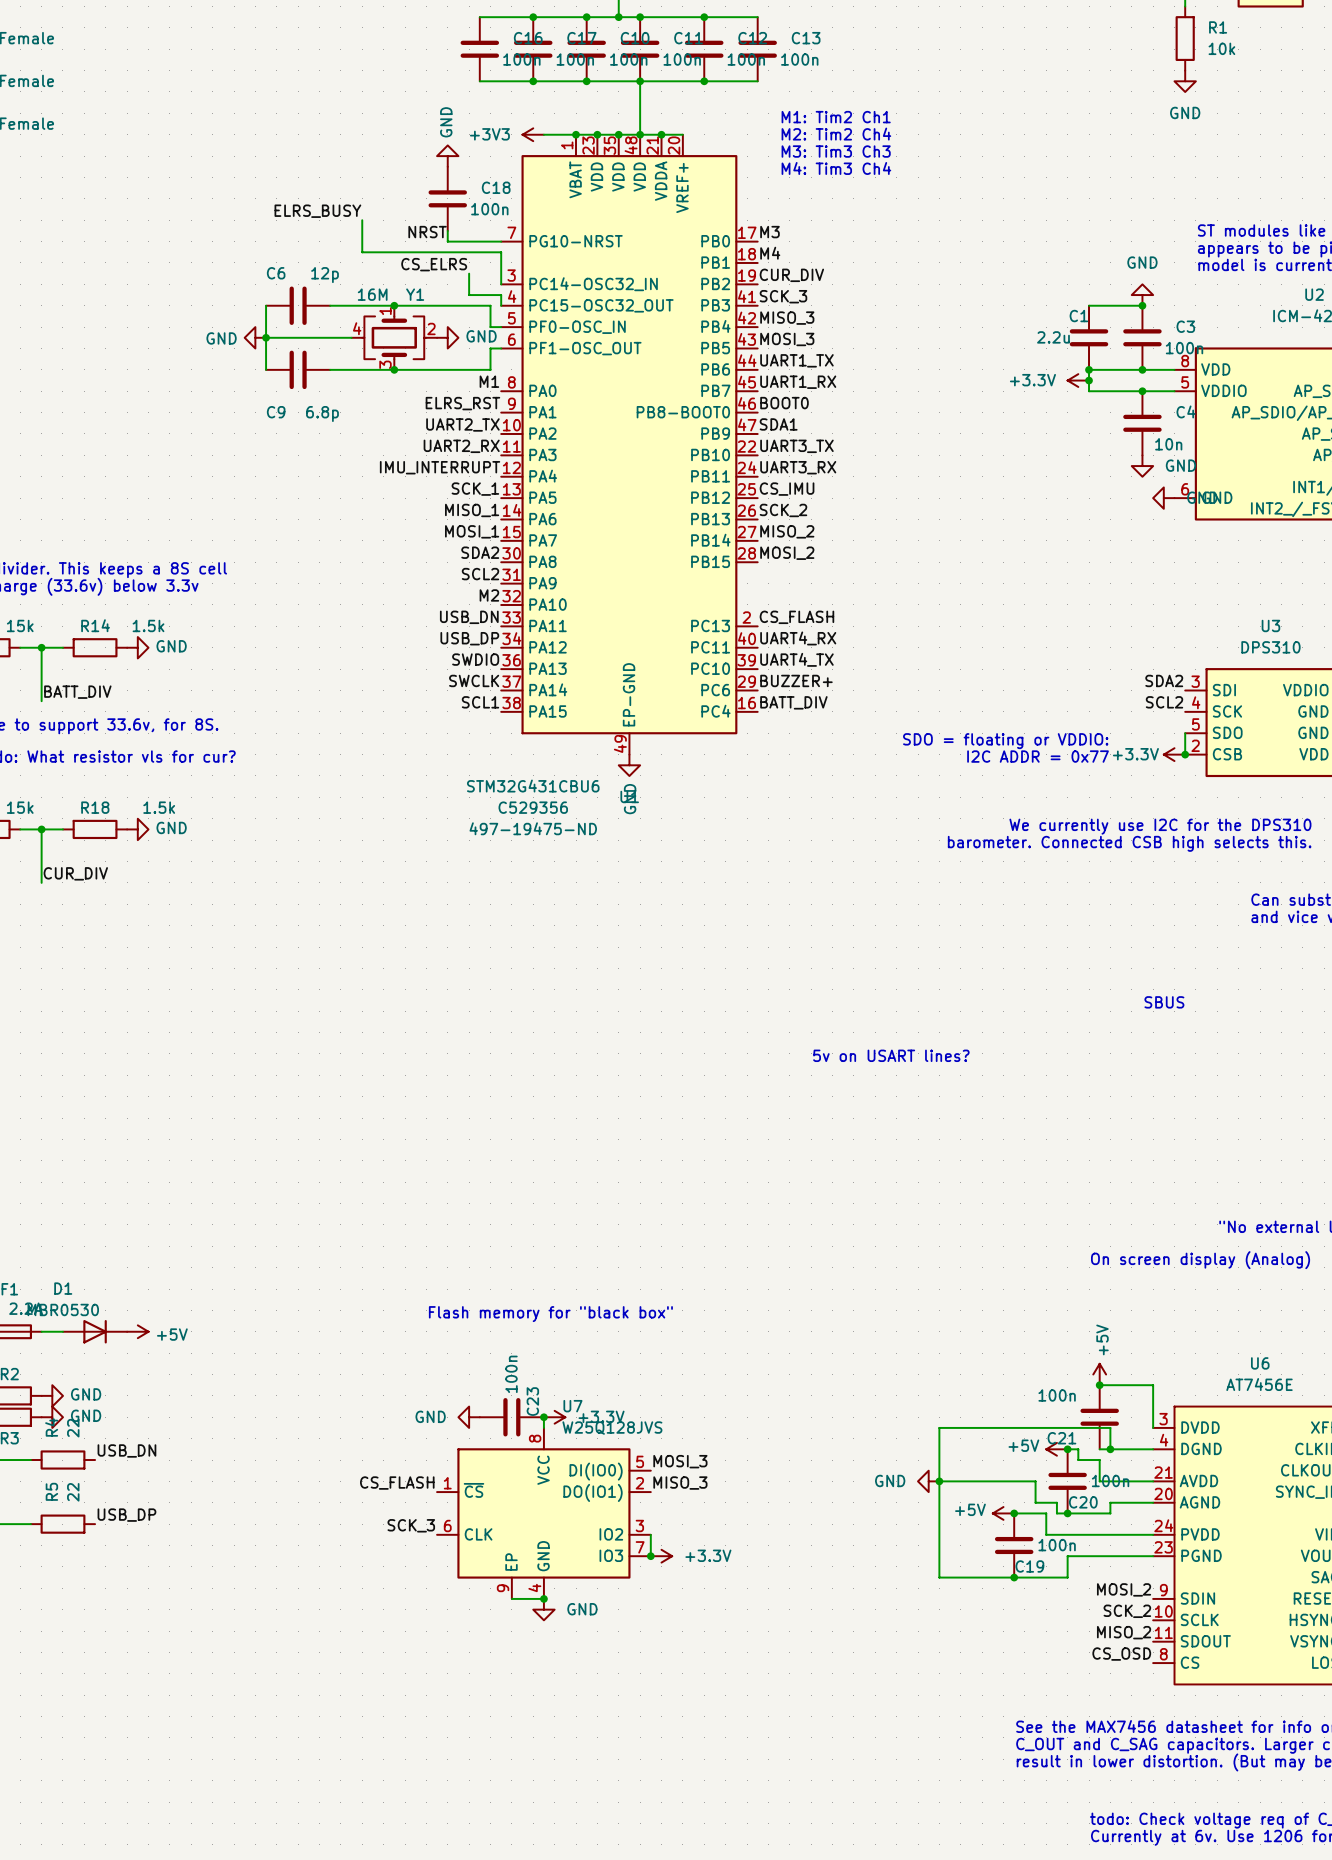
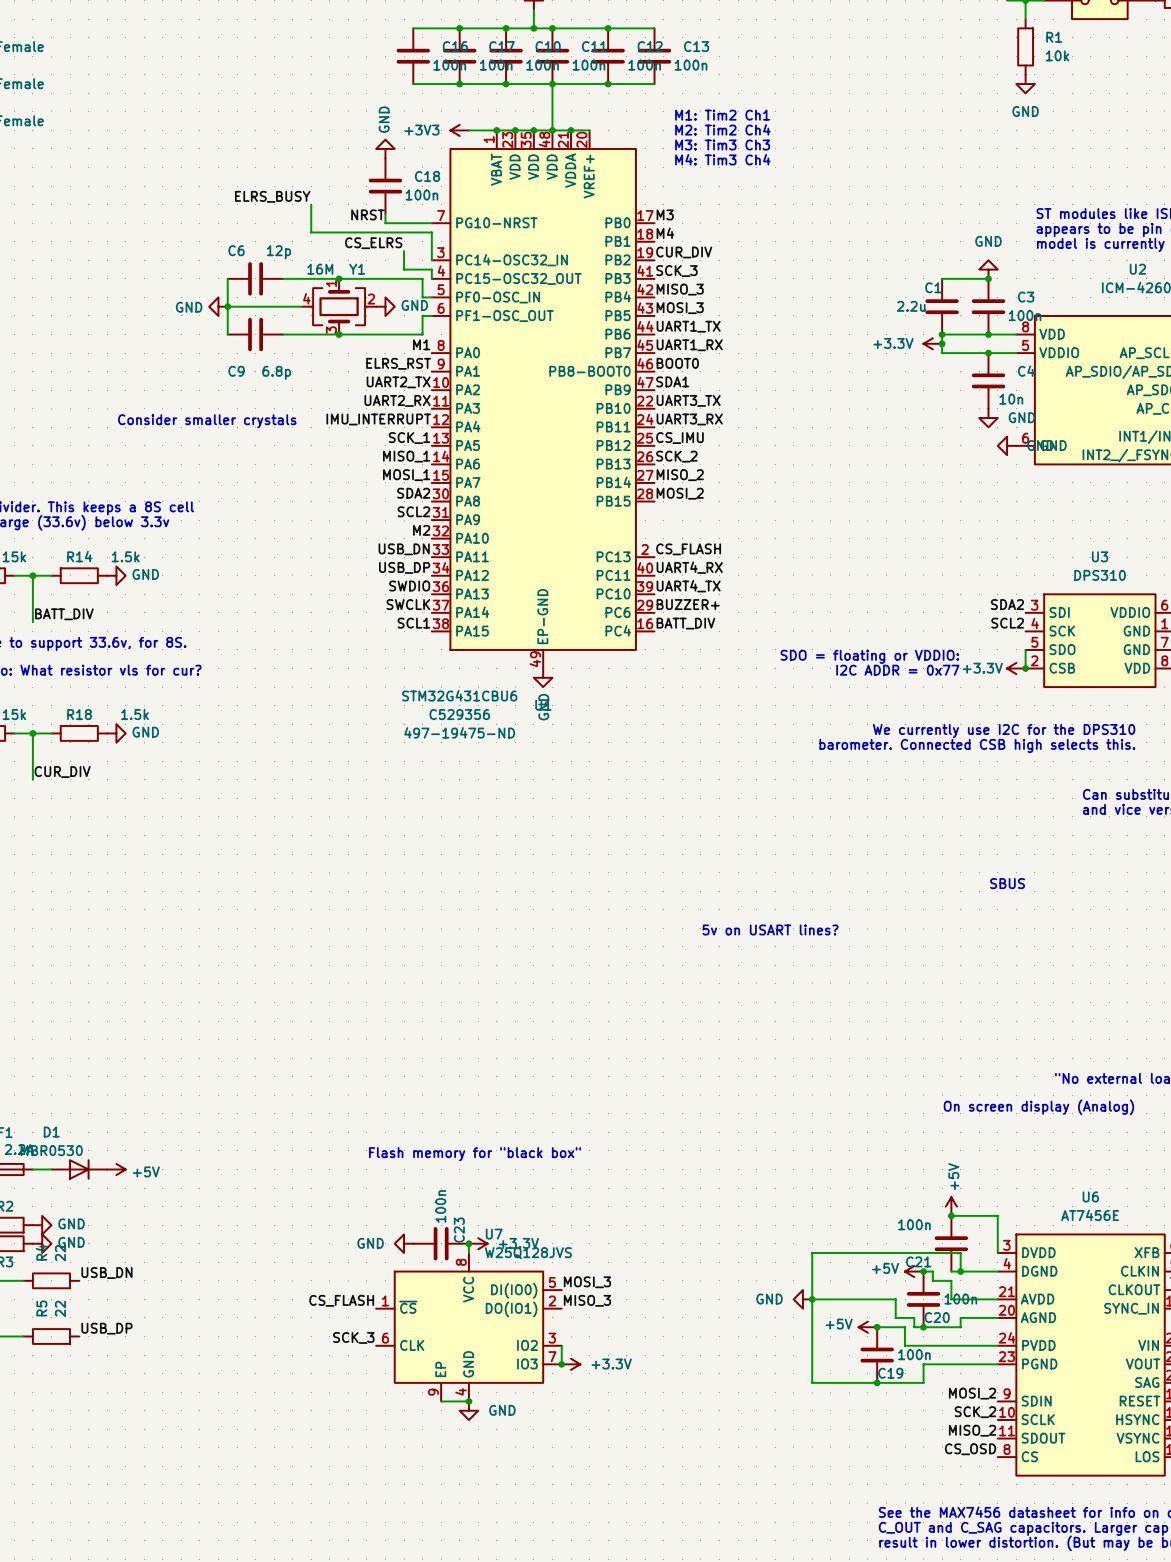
text: none -> Consider smaller crystals (207, 421)

